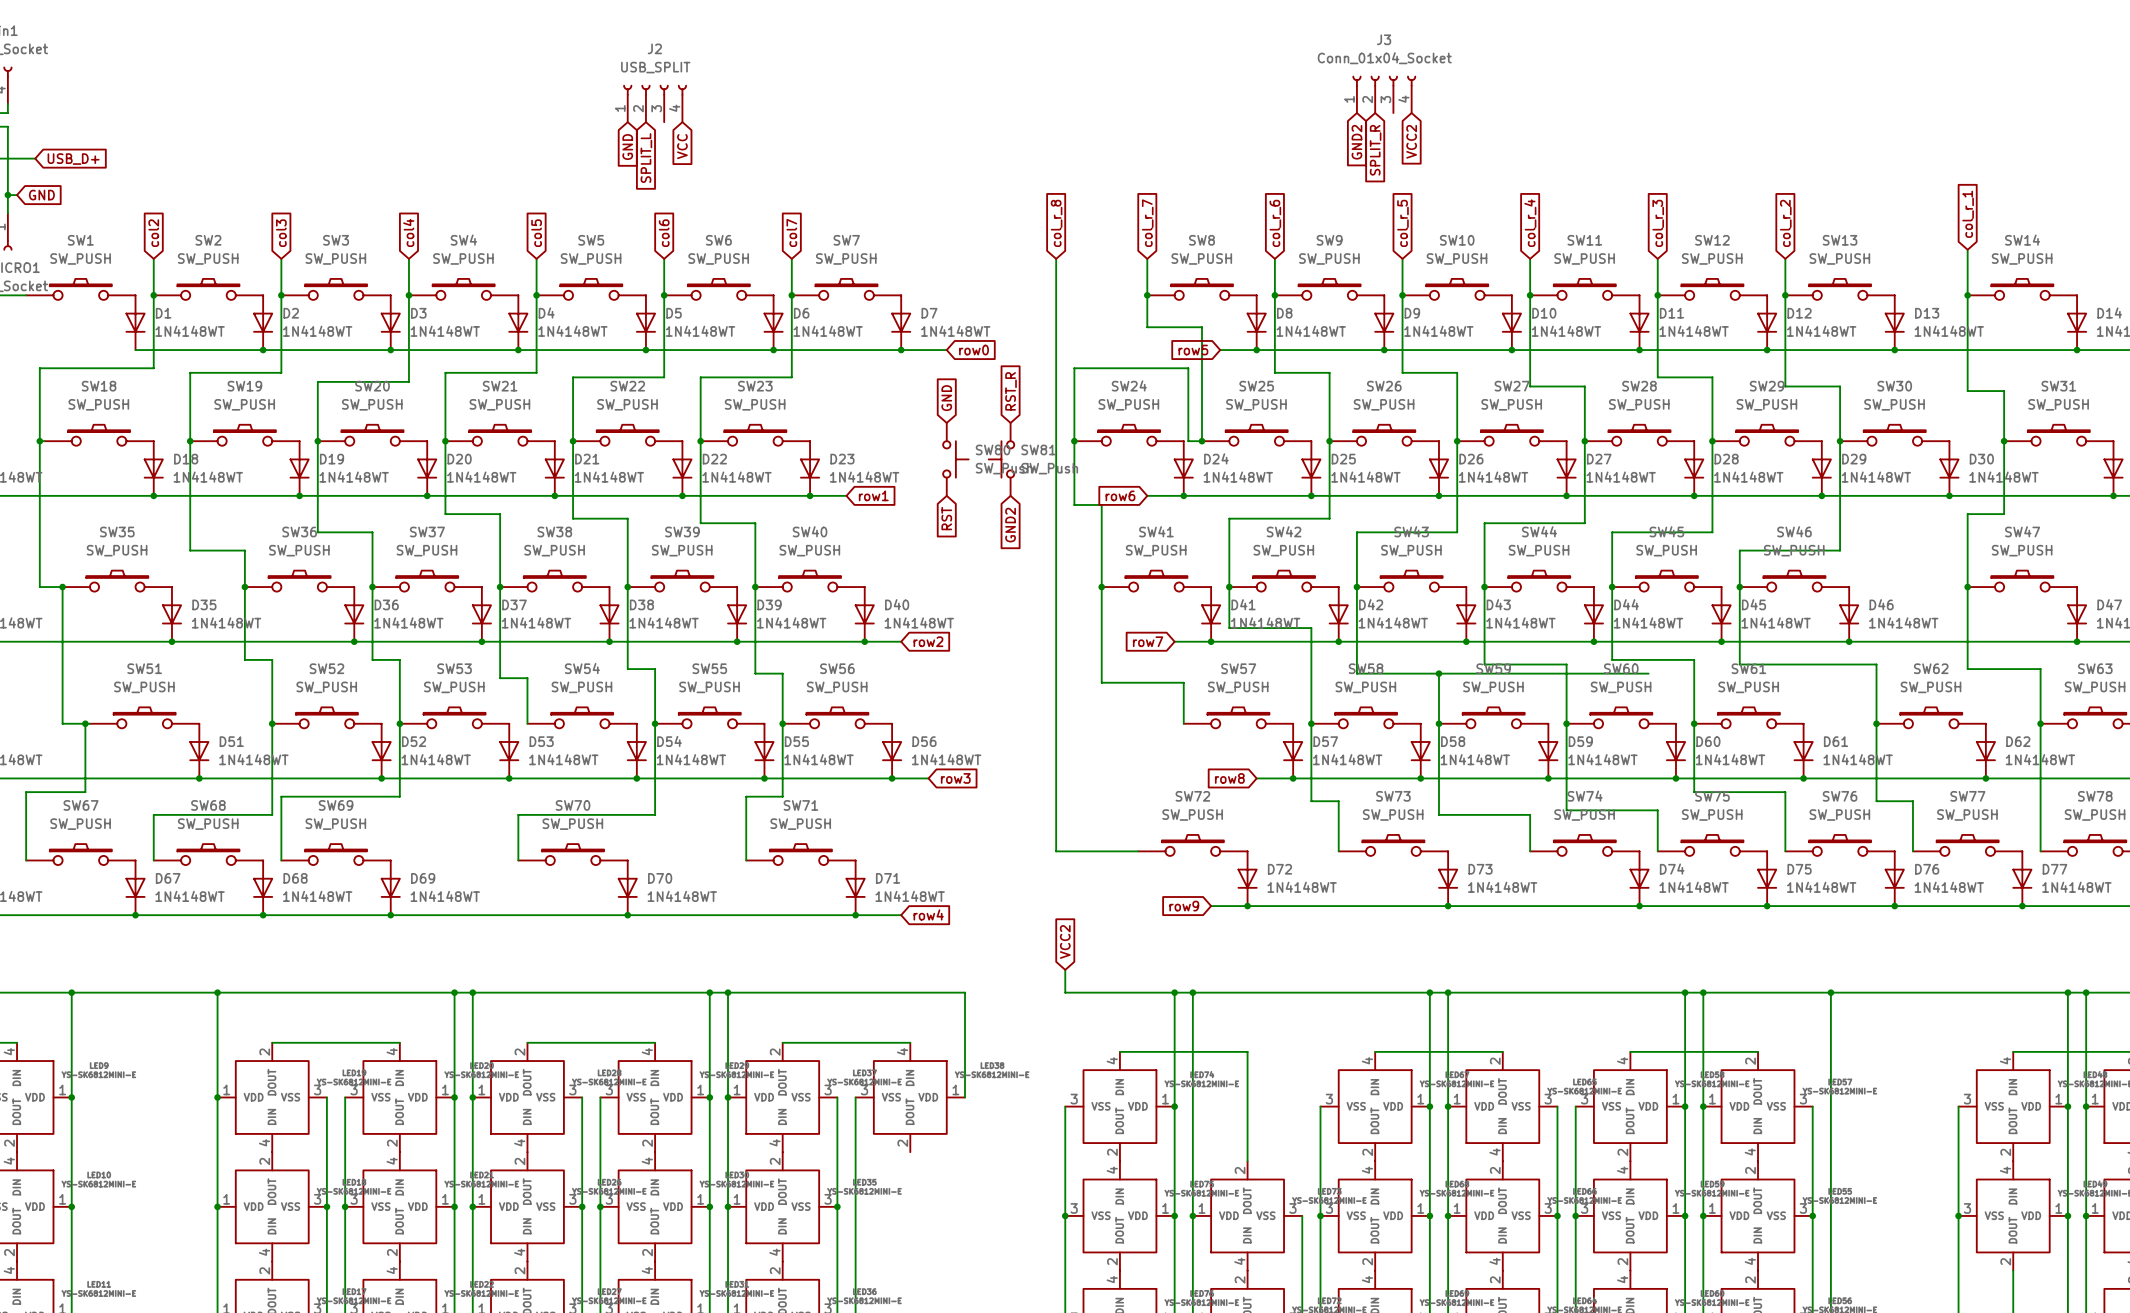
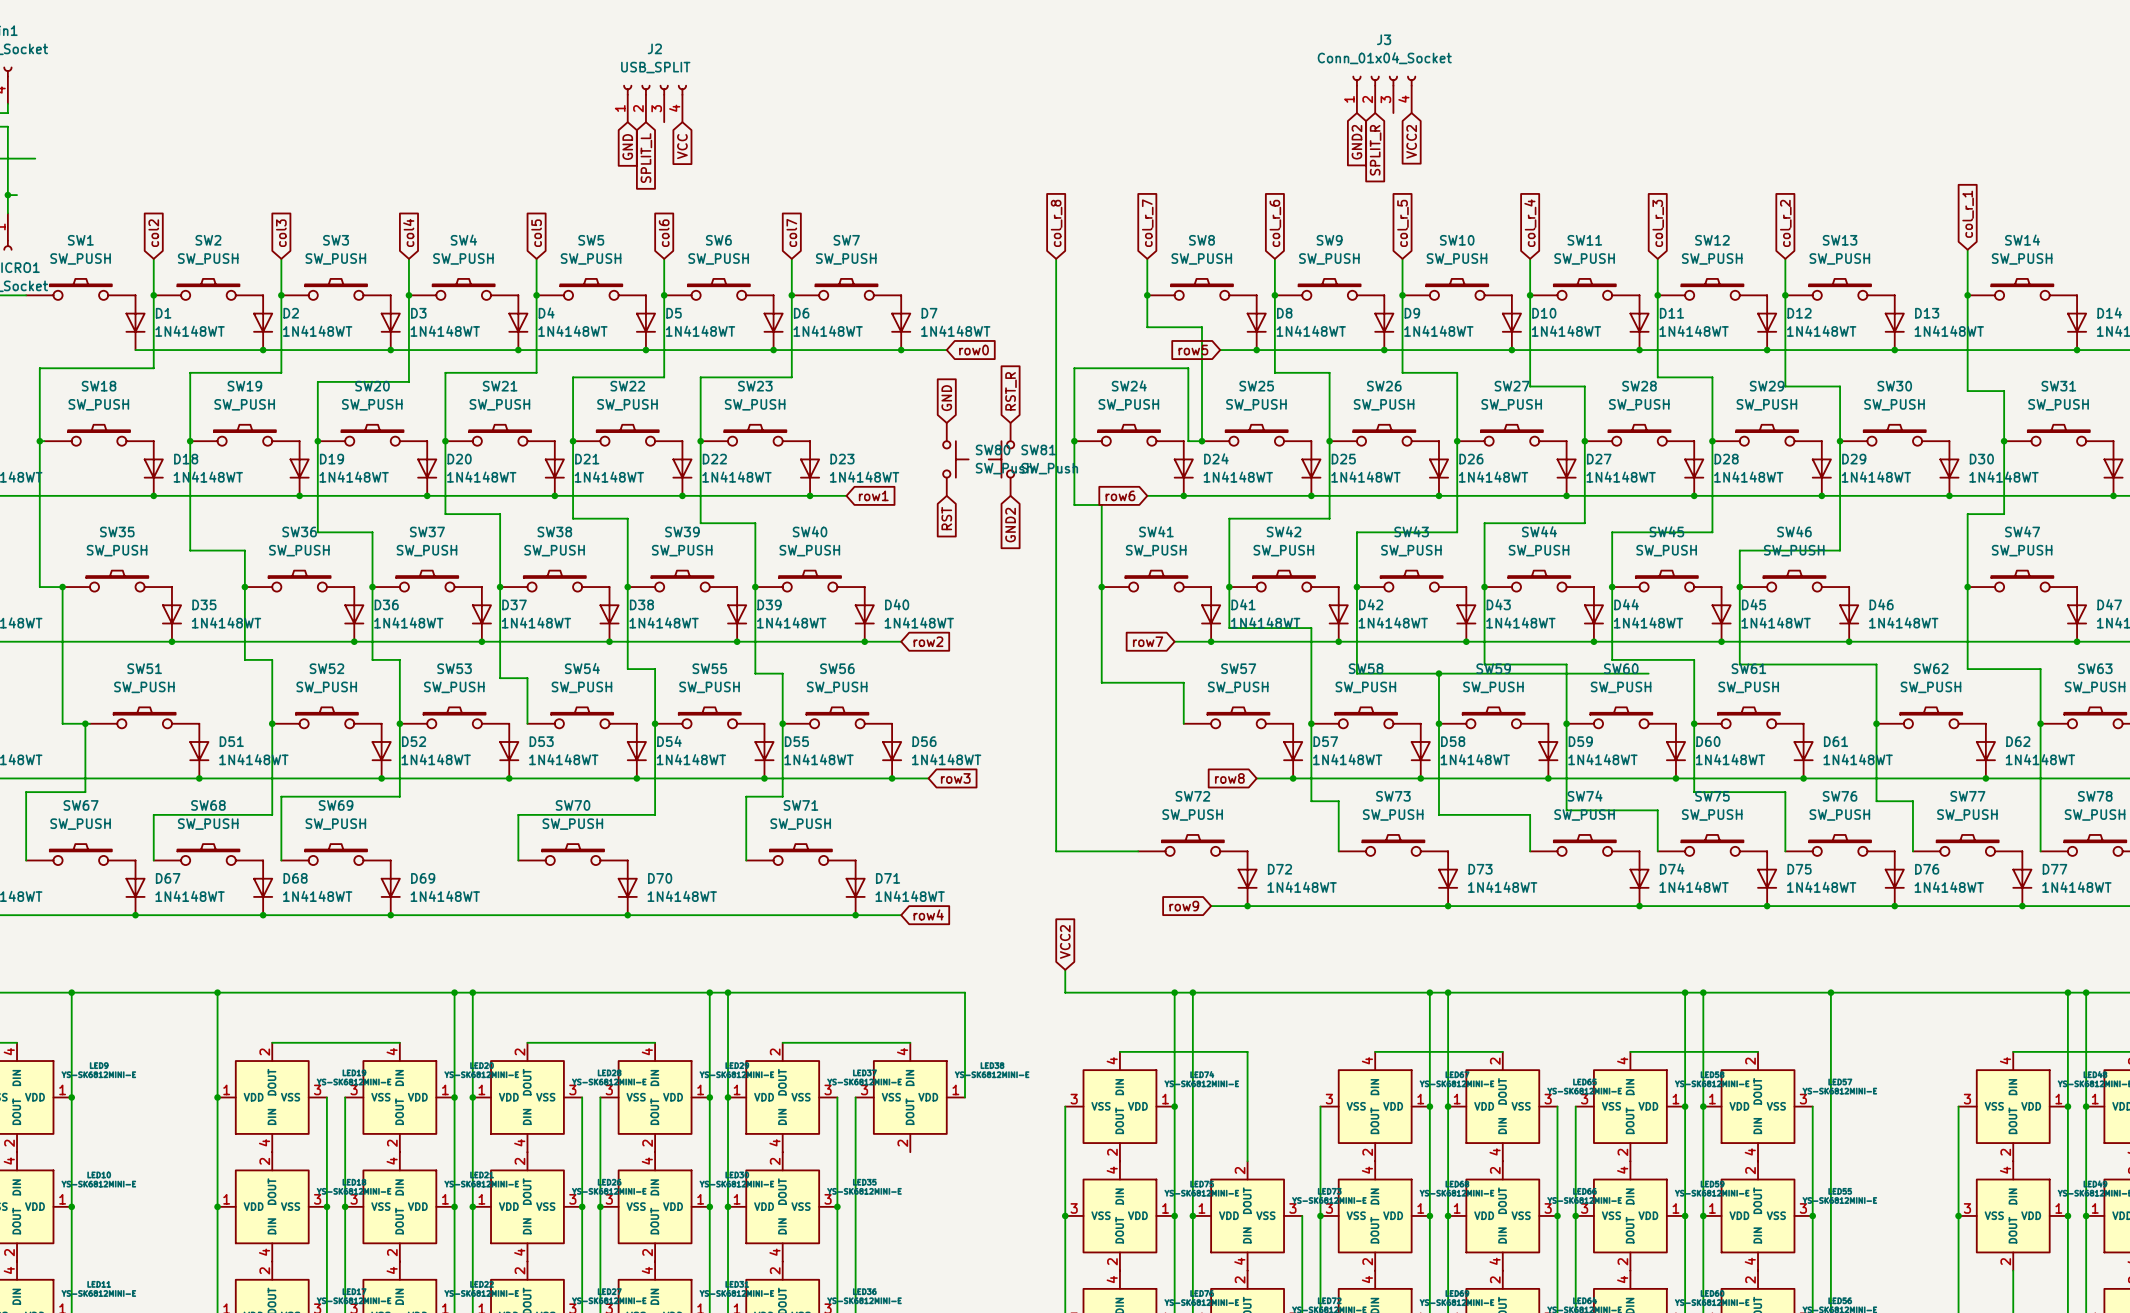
global label: USB_D+ (73, 159) -> none
global label: GND (41, 195) -> none

